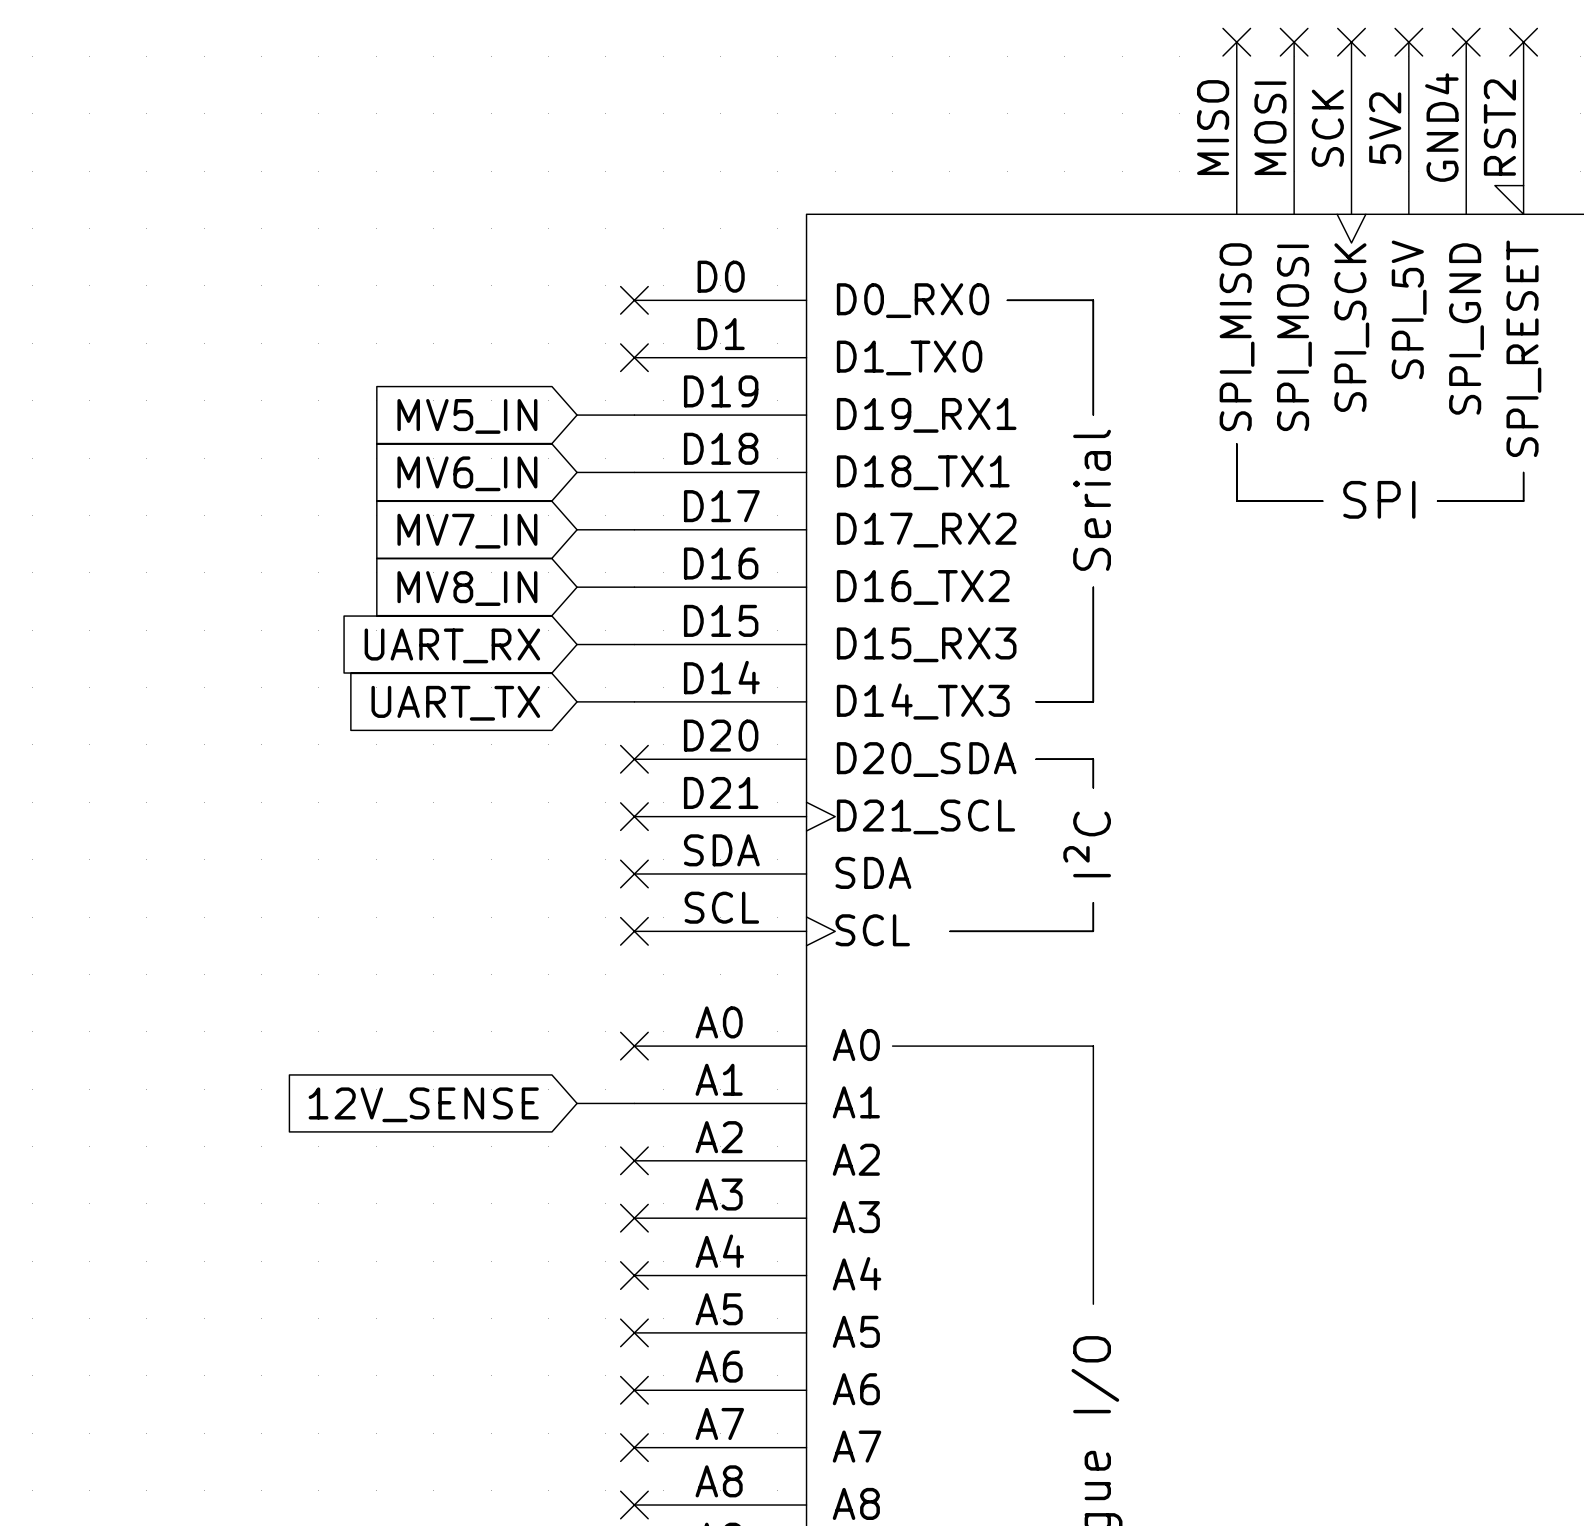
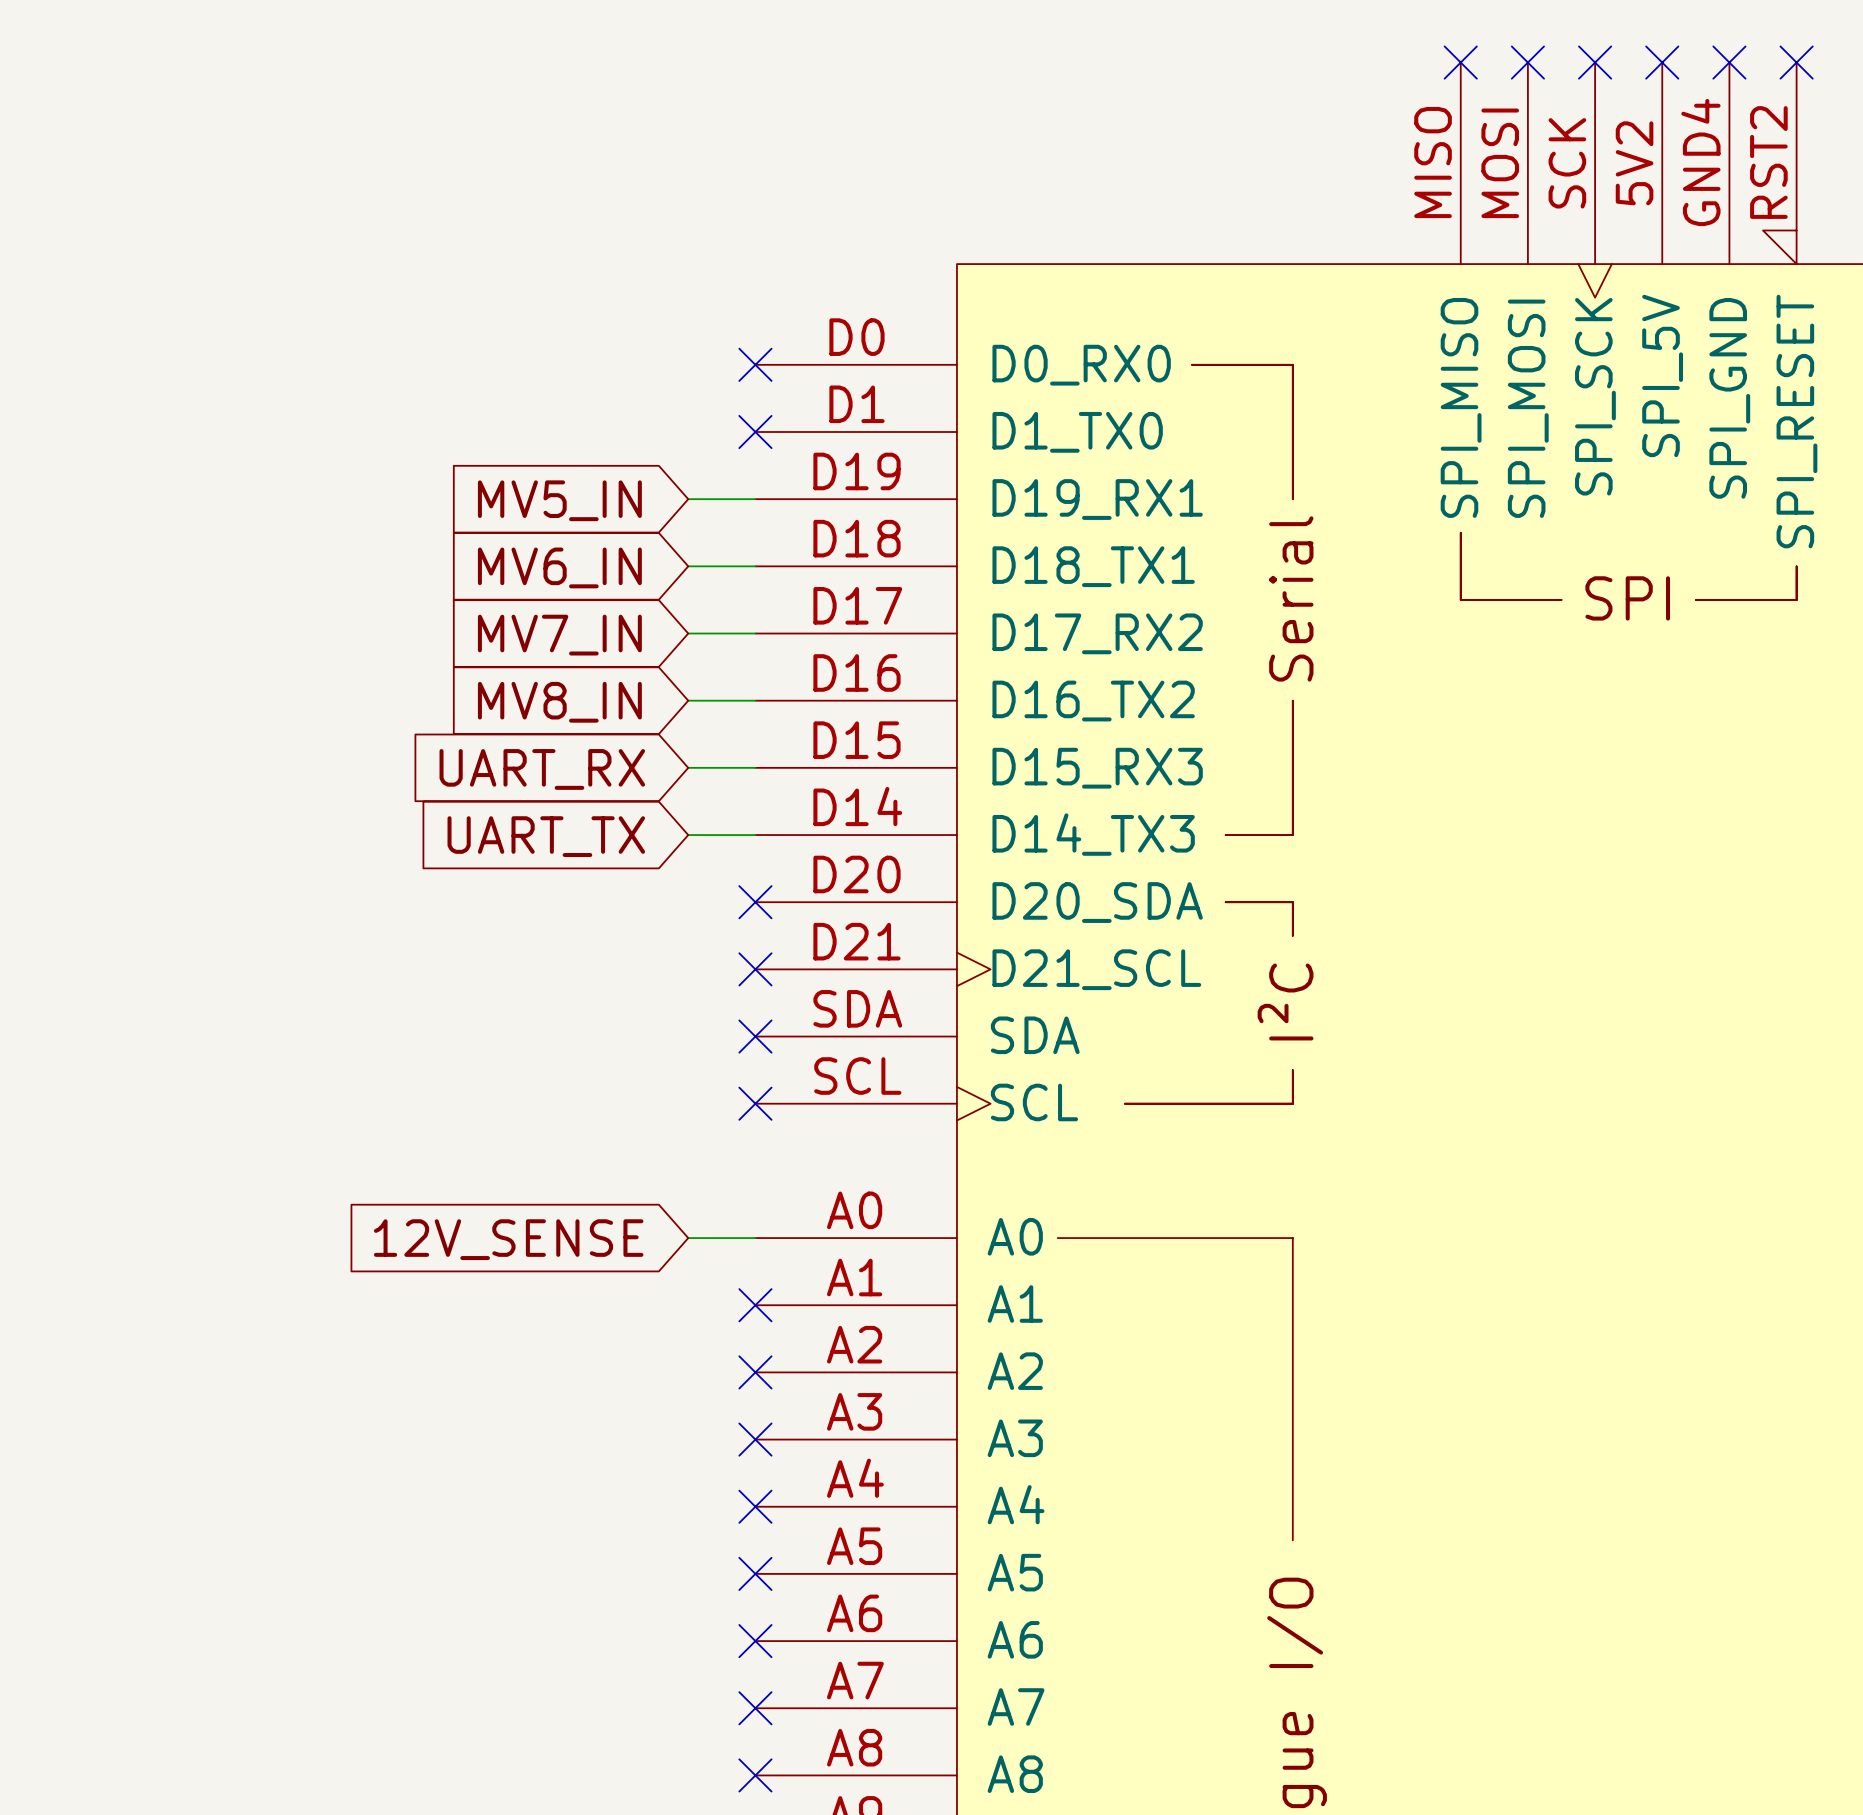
no-connect mark position: (634, 1046) -> (755, 1305)
wire: (577, 1103) (634, 1103) -> (688, 1238) (755, 1238)
global label position: 12V_SENSE (423, 1104) -> 12V_SENSE (508, 1239)

